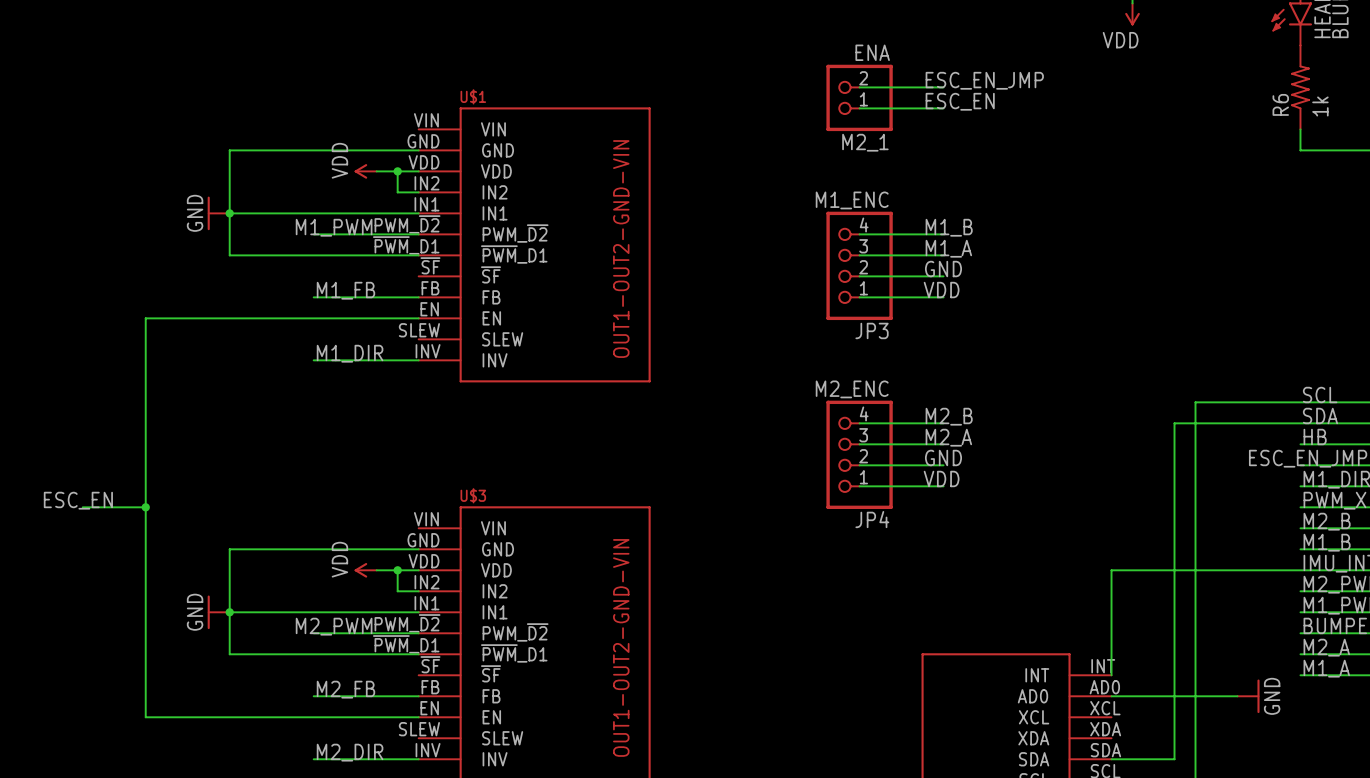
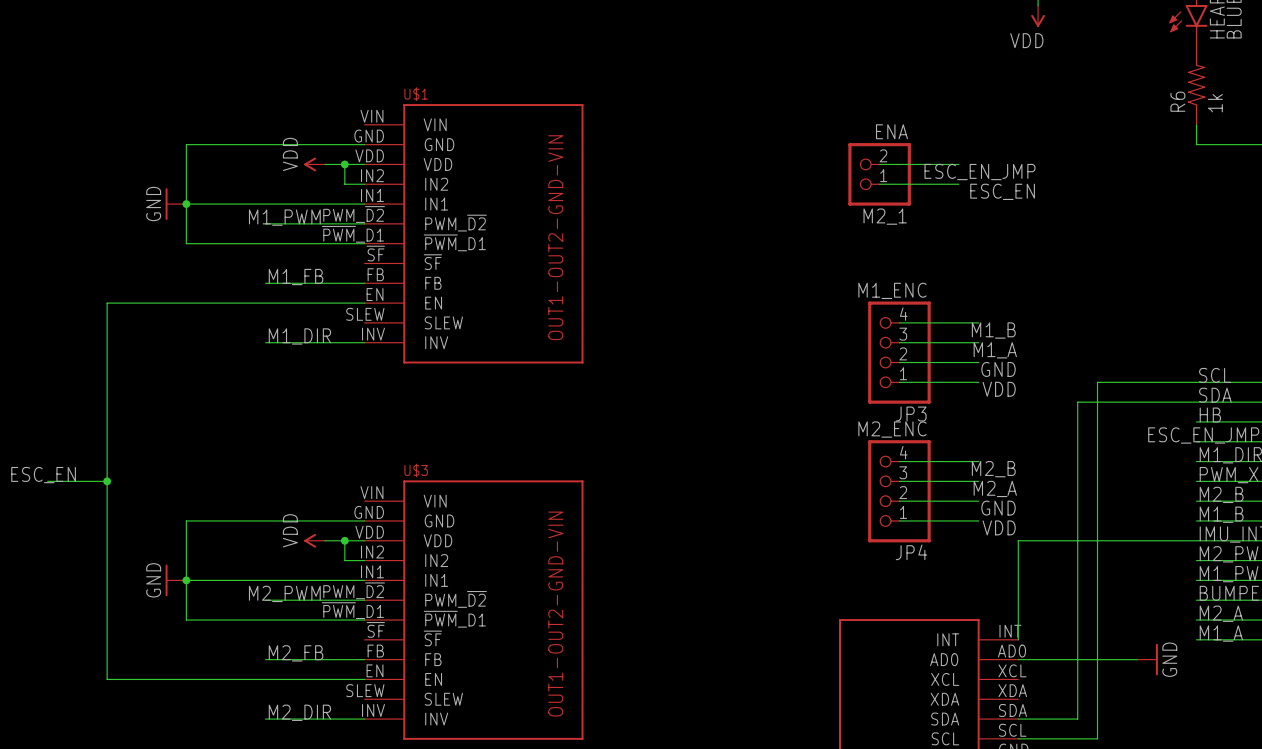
label: ESC_EN_JMP (984, 80) -> none
wire: (859, 87) (943, 87) -> none
M2_1 position: (859, 97) -> (879, 174)
label: ESC_EN (960, 101) -> none
wire: (859, 108) (943, 108) -> (879, 184) (958, 184)
label: none -> ESC_EN_JMP (980, 172)
label: none -> ESC_EN (1002, 191)
label: M1_B (949, 227) -> none
wire: (859, 234) (943, 234) -> (879, 164) (958, 164)
label: M1_A (948, 248) -> none
wire: (859, 255) (943, 255) -> (899, 362) (978, 362)
JP3 position: (859, 265) -> (899, 352)
label: GND (943, 269) -> none
wire: (859, 276) (943, 276) -> (899, 322) (978, 322)
label: VDD (941, 290) -> none
wire: (859, 297) (943, 297) -> (899, 342) (978, 342)
label: none -> M1_B (993, 330)
label: none -> M1_A (995, 350)
label: none -> GND (998, 369)
wire: none -> (899, 382) (978, 382)
label: none -> VDD (999, 389)
label position: M2_B (949, 416) -> M2_B (993, 469)
wire: (859, 423) (943, 423) -> (899, 461) (978, 461)
label position: M2_A (948, 437) -> M2_A (995, 488)
wire: (859, 444) (943, 444) -> (899, 481) (978, 481)
JP4 position: (859, 454) -> (899, 491)
label: GND (943, 457) -> none
wire: (859, 465) (943, 465) -> (899, 501) (978, 501)
label: VDD (941, 478) -> none
wire: (859, 486) (943, 486) -> (899, 520) (978, 520)
label: none -> GND (998, 508)
label: none -> VDD (999, 527)

